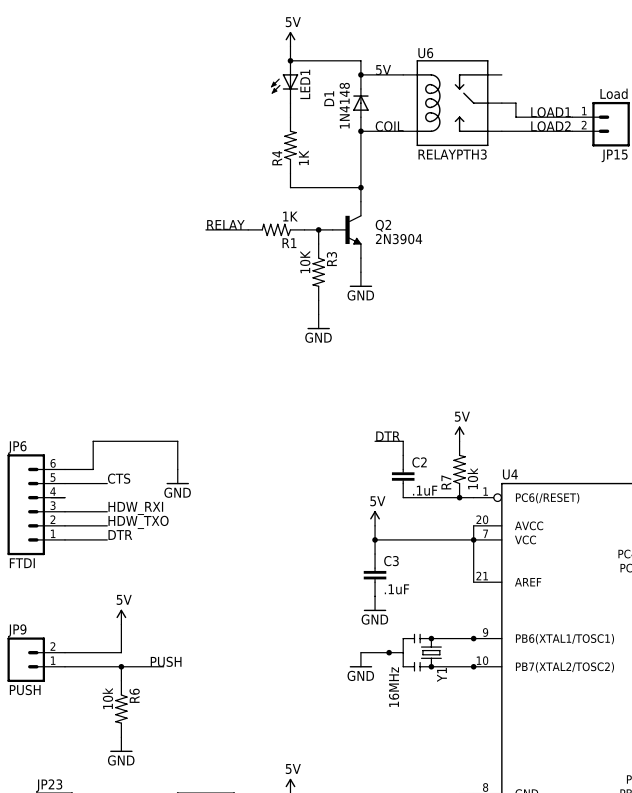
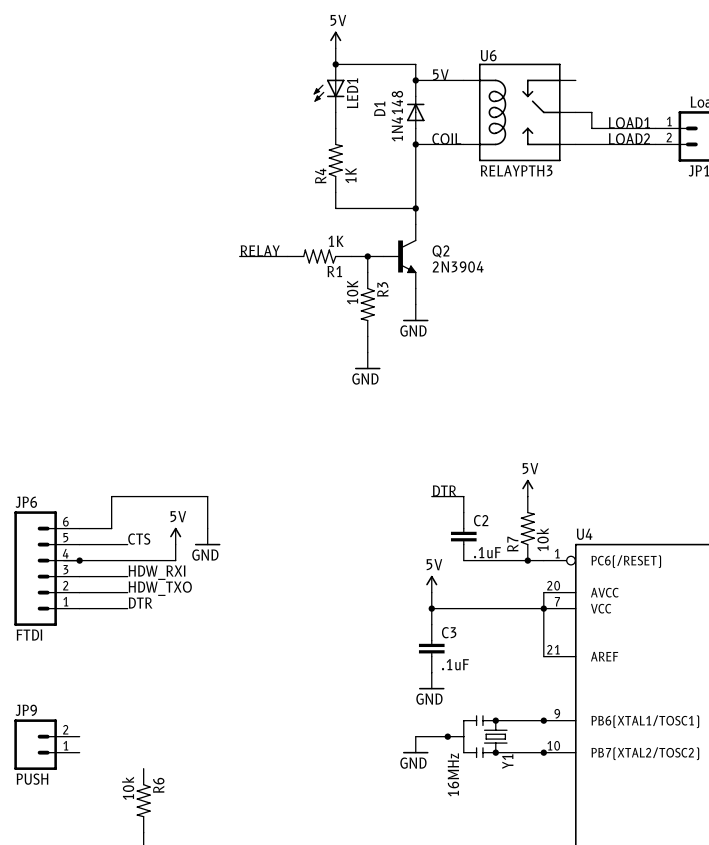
power symbol: none -> 5V (175, 536)
wire: none -> (175, 544) (175, 560) (79, 560)
junction: none -> (79, 560)
power symbol: 5V (121, 617) -> none
wire: (121, 624) (121, 652) (65, 652) -> none
label: PUSH (166, 661) -> none
wire: (65, 666) (163, 666) -> none
wire: (121, 666) (121, 680) -> none
junction: (121, 666) -> none

